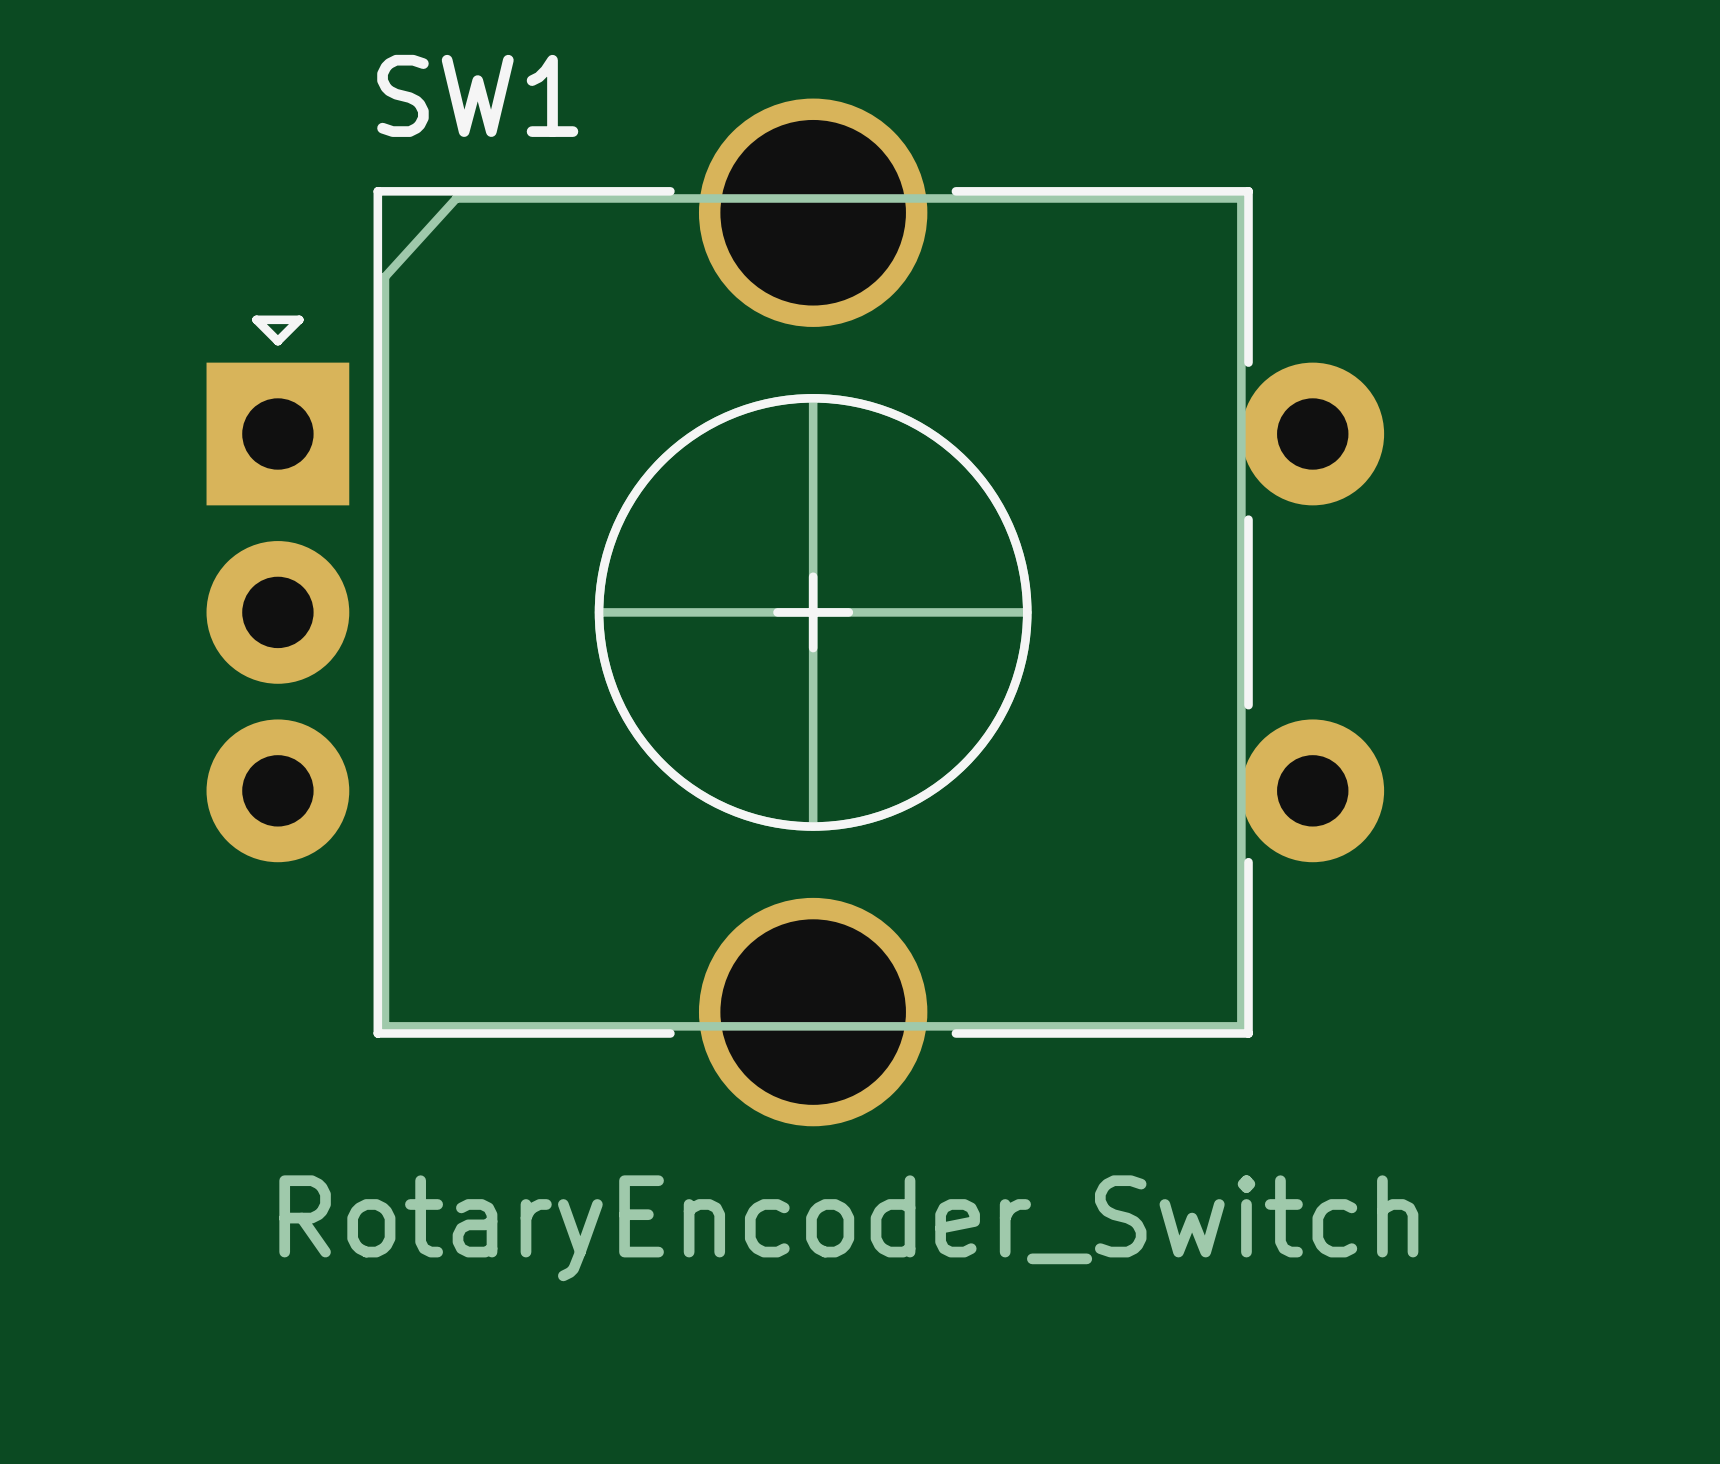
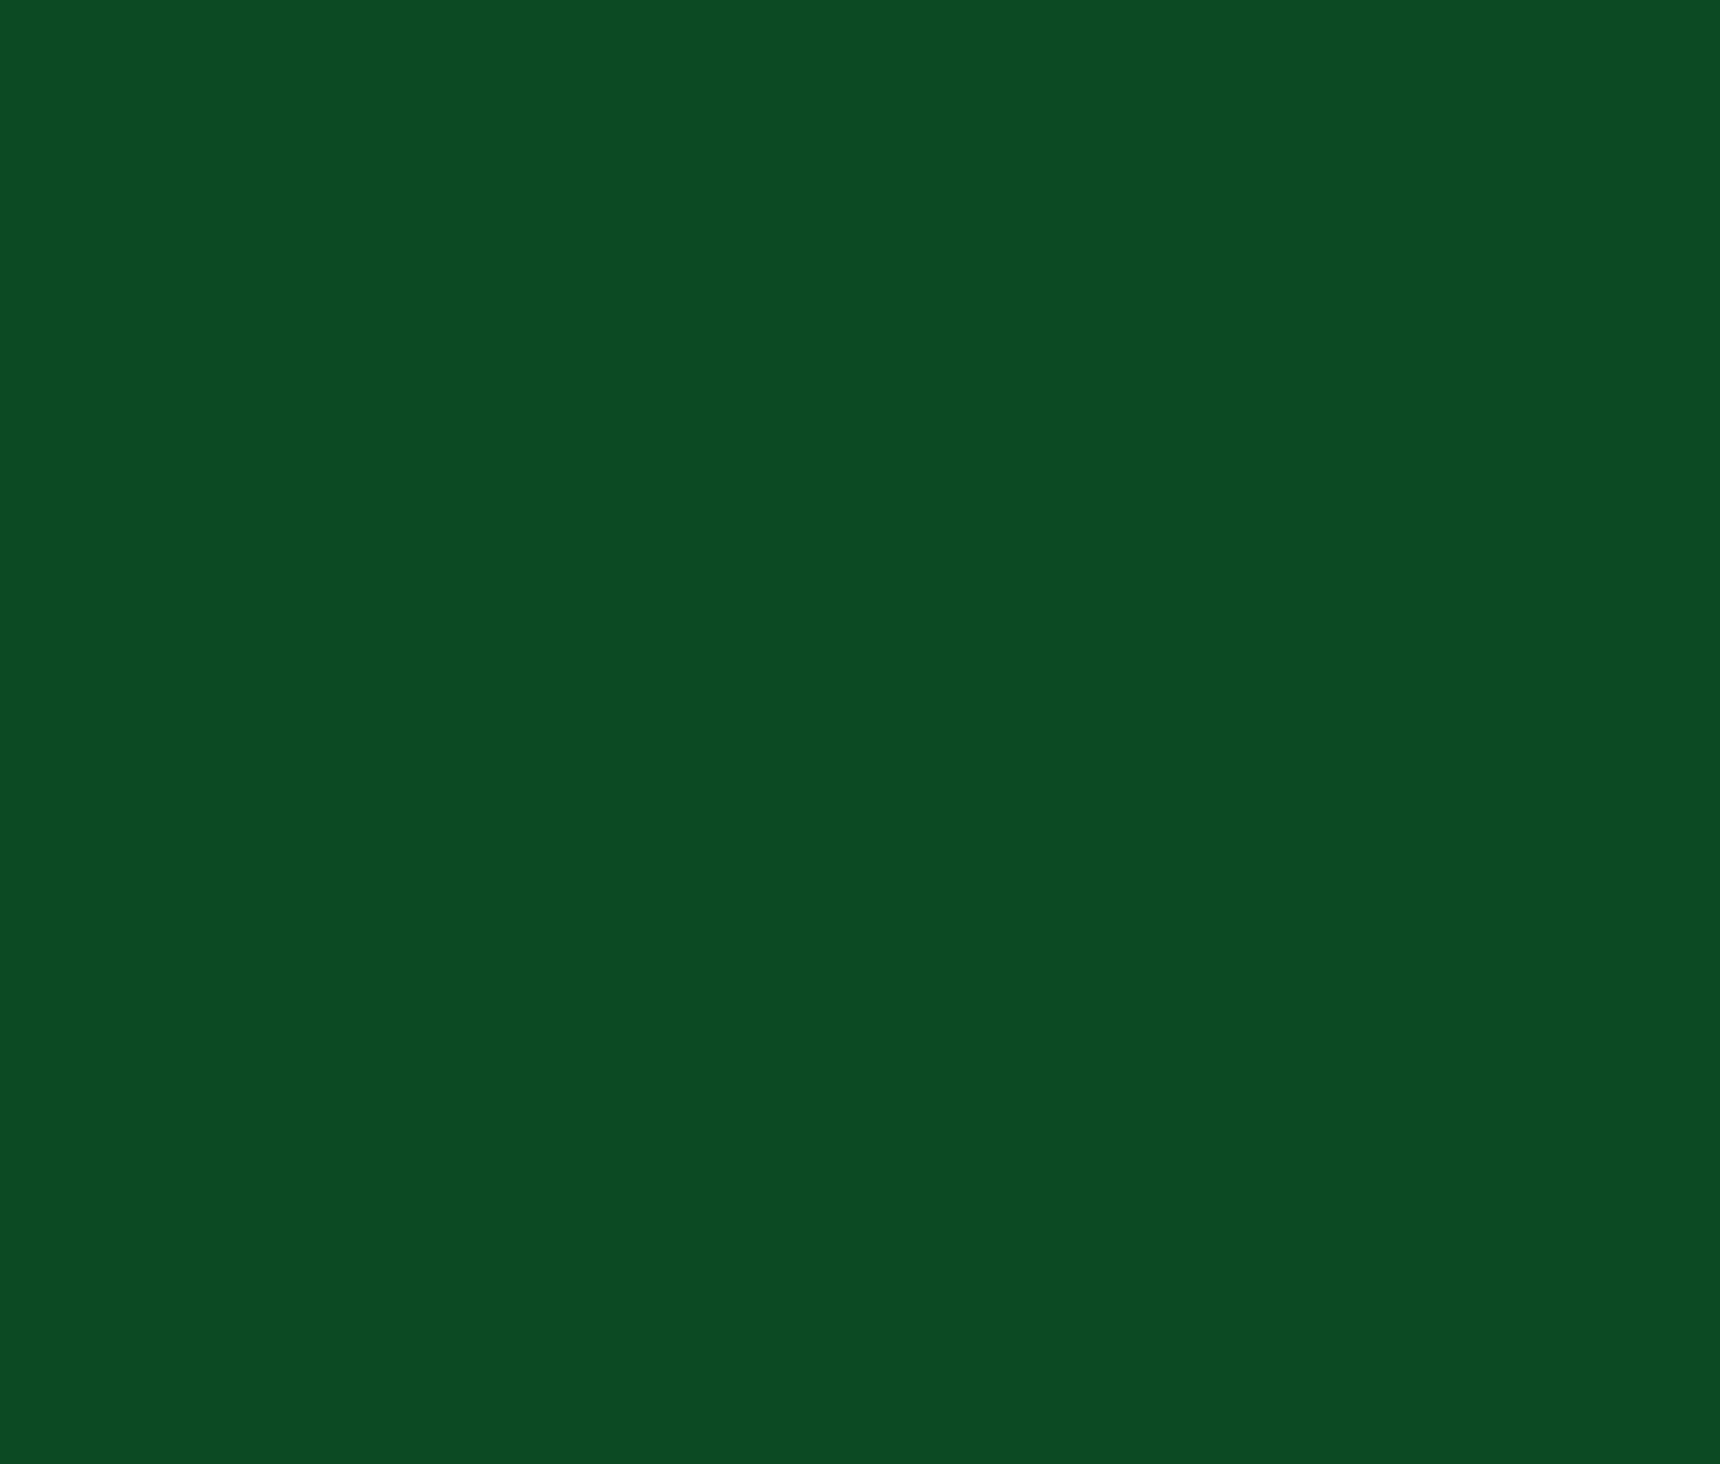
SW1: RotaryEncoder_Switch (795, 612) -> none

